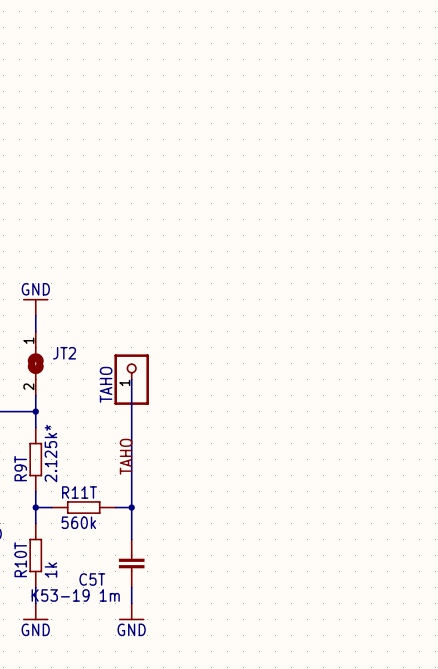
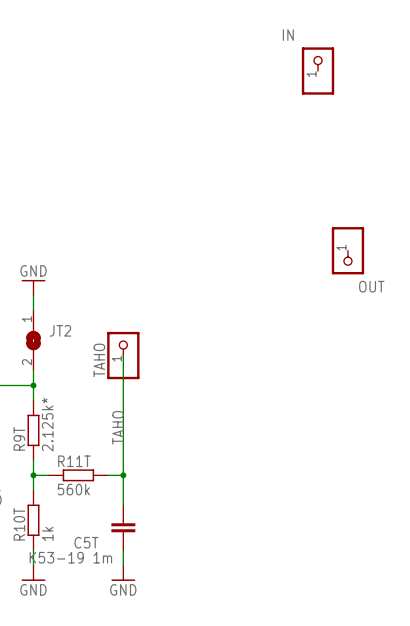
IN: none -> (318, 71)
OUT: none -> (347, 250)

